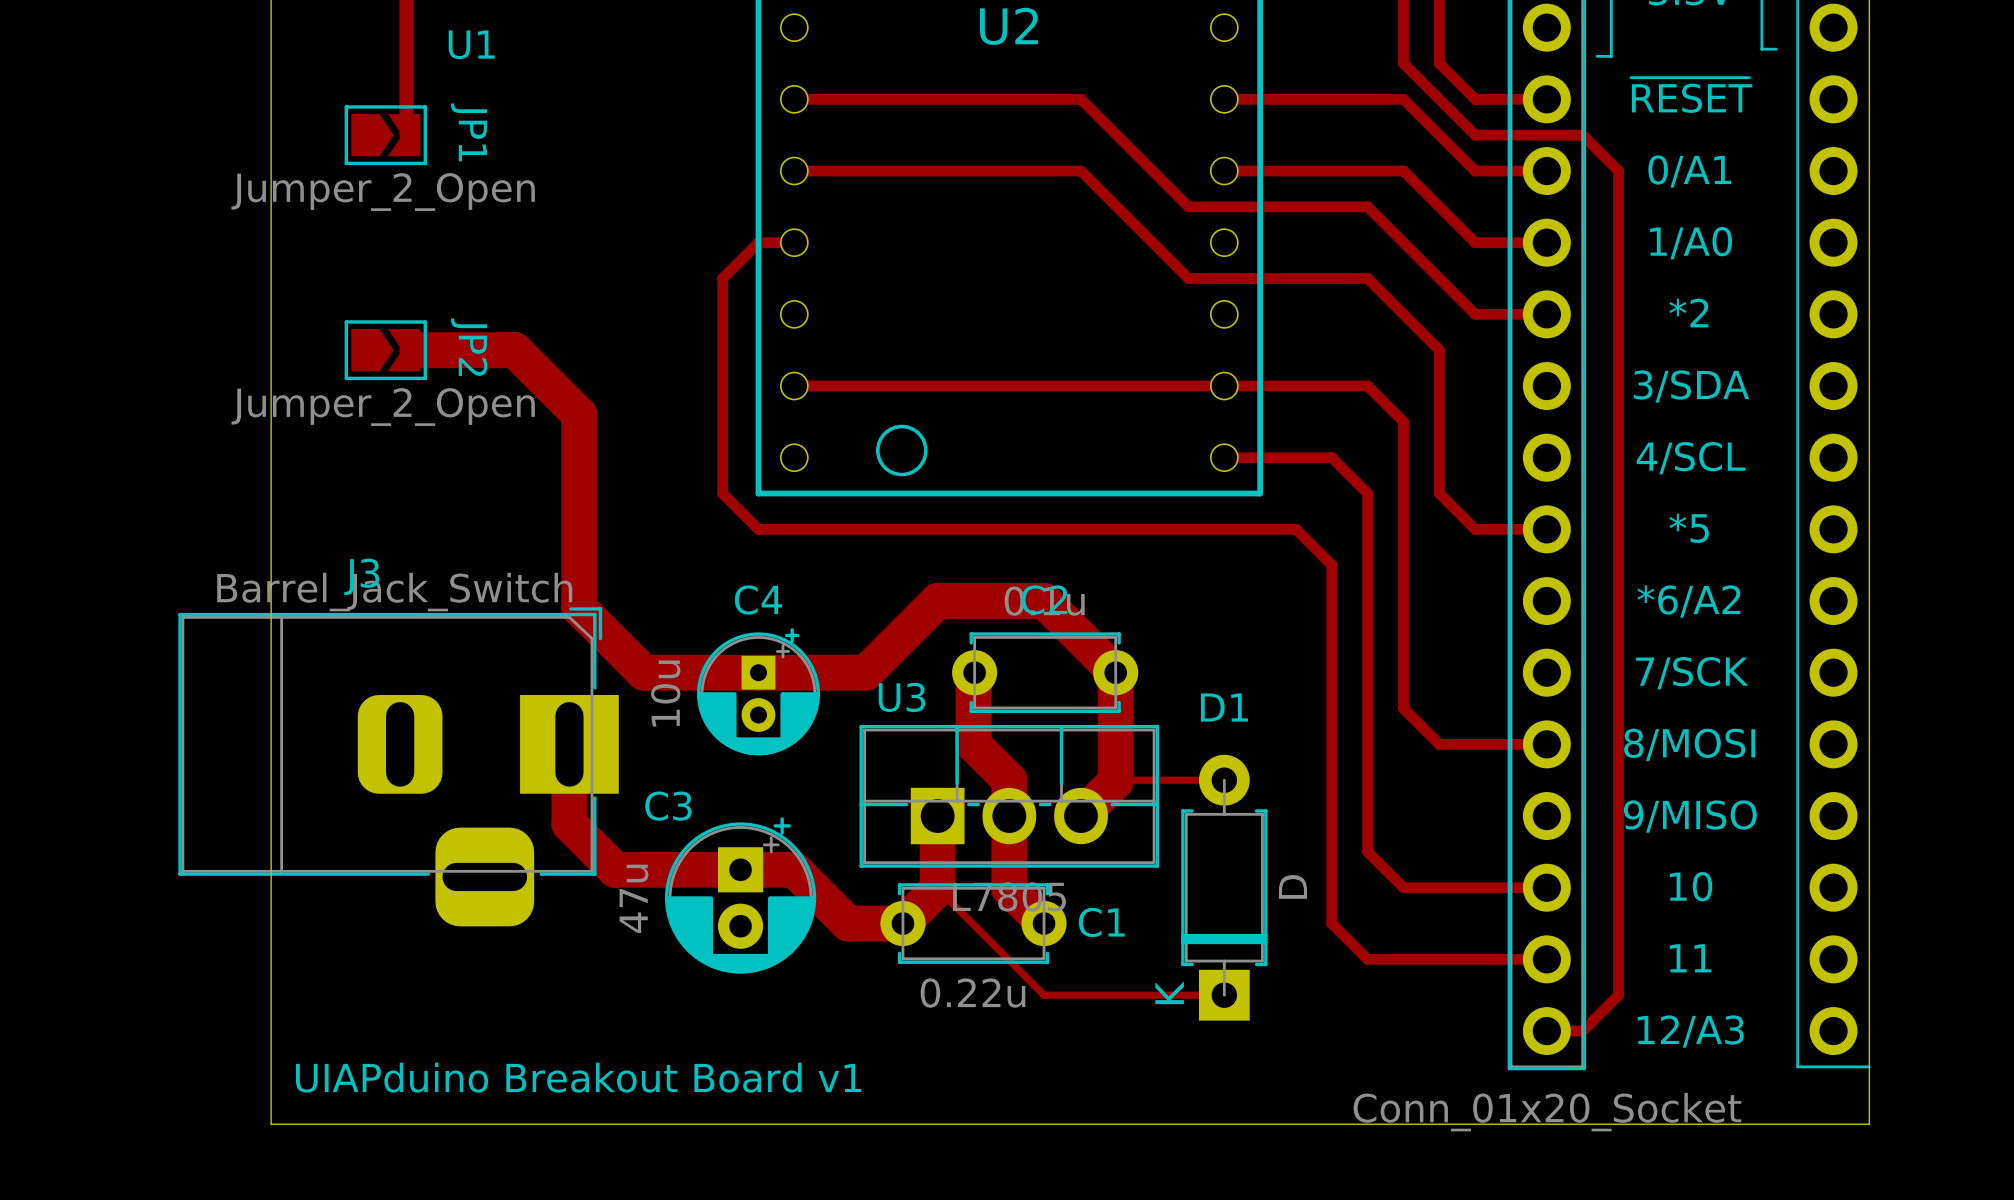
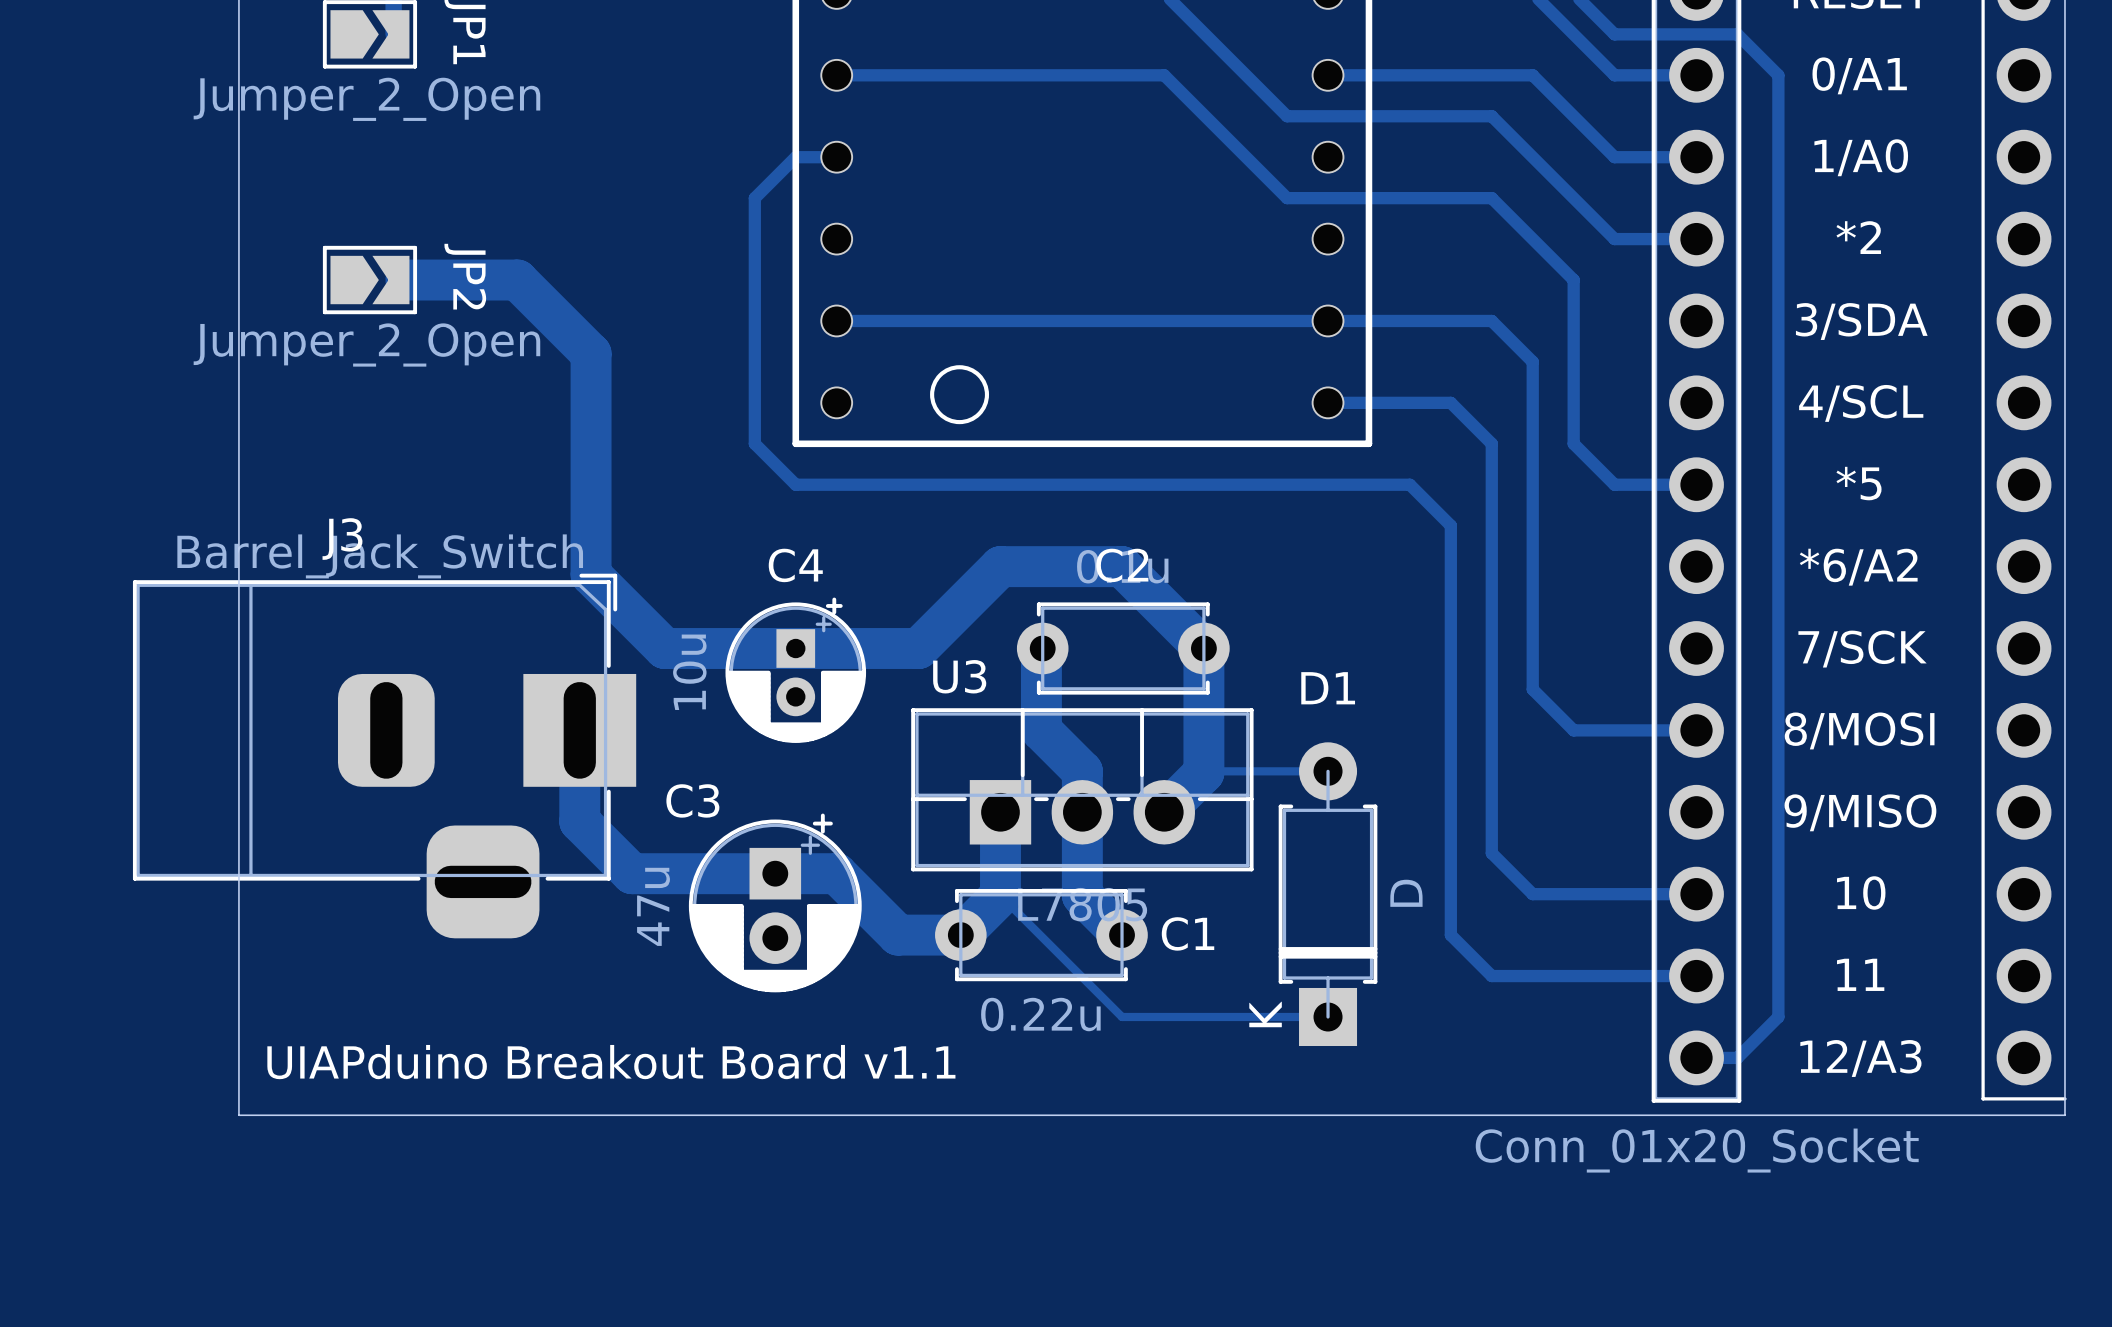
text: UIAPduino Breakout Board v1 (578, 1077) -> UIAPduino Breakout Board v1.1 (611, 1062)
board edge: (271, 1081) (271, 1124) (1869, 1124) (1869, 1081) -> (238, 1115) (2064, 1115)

